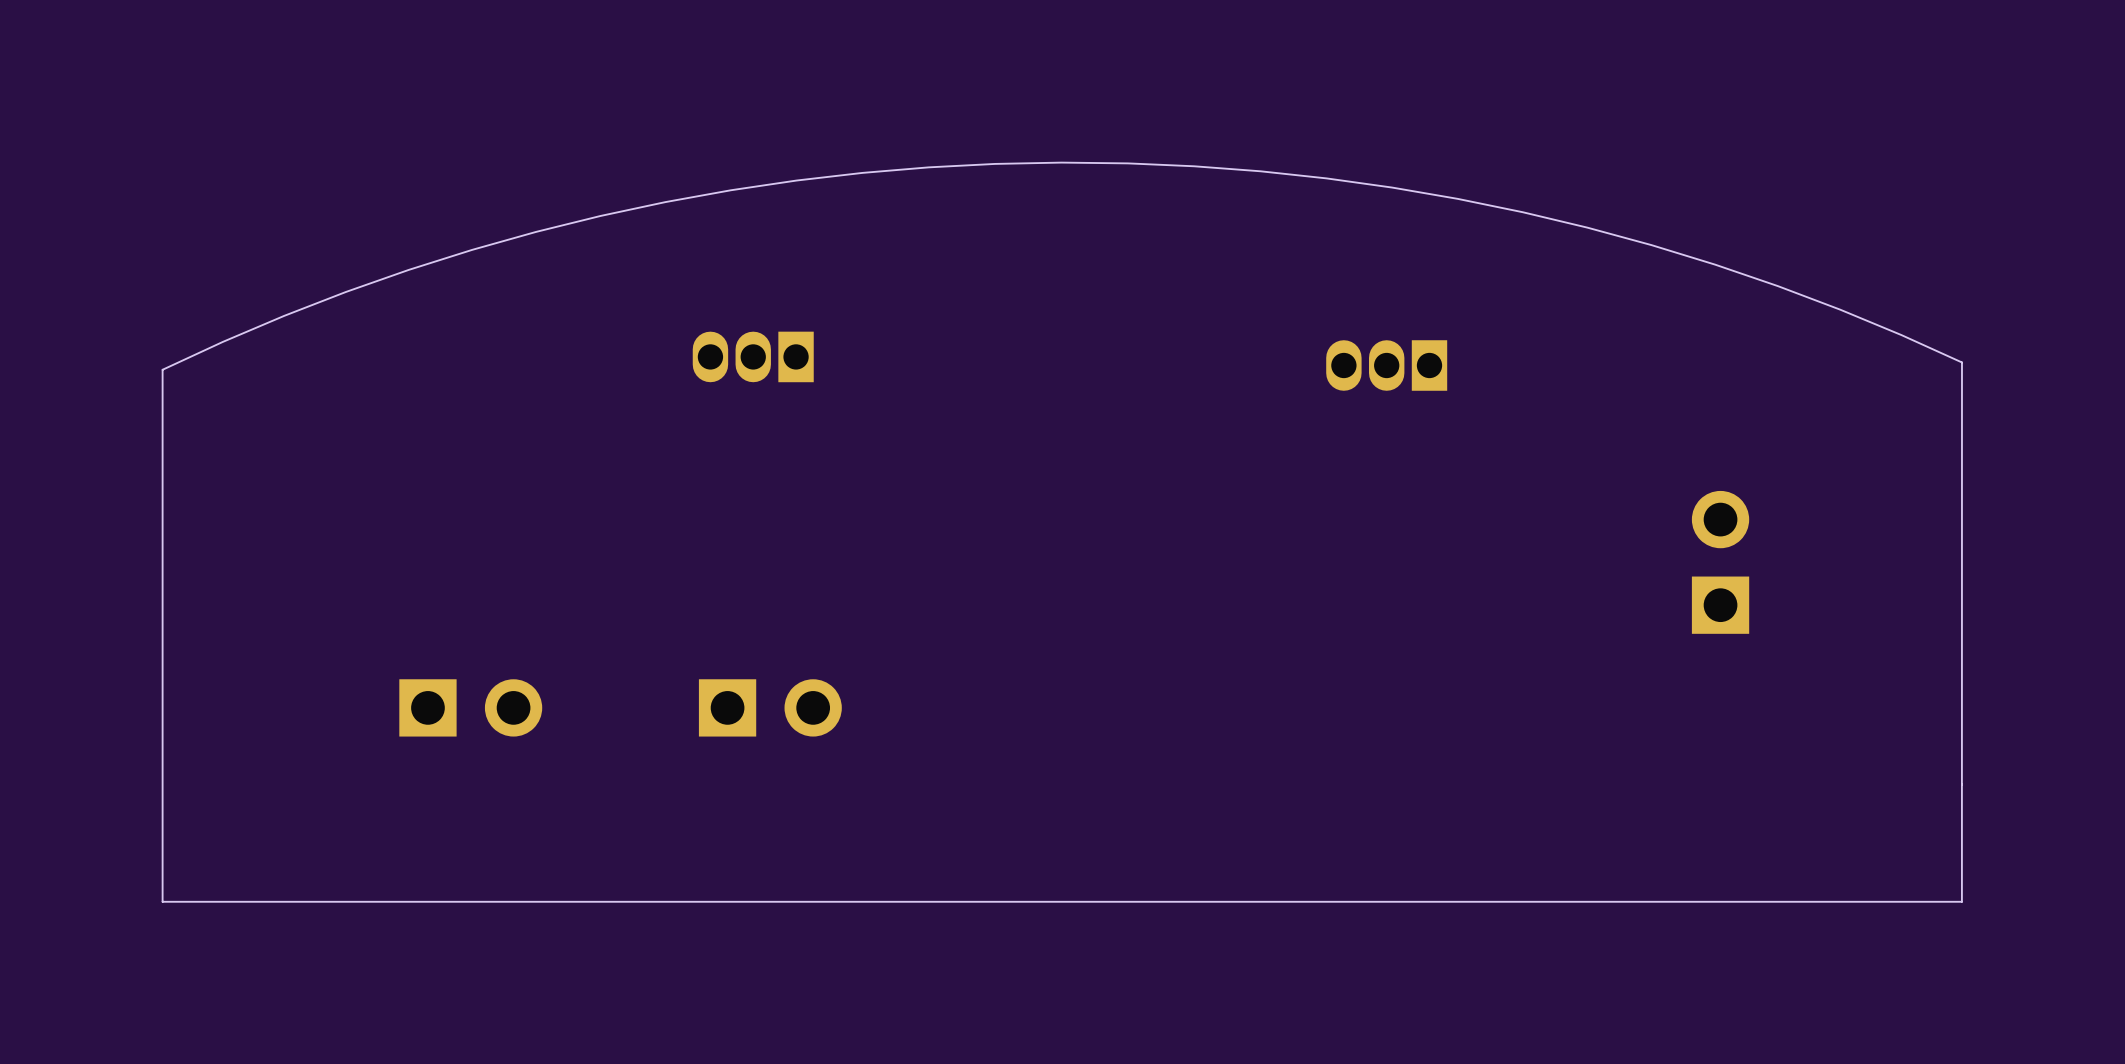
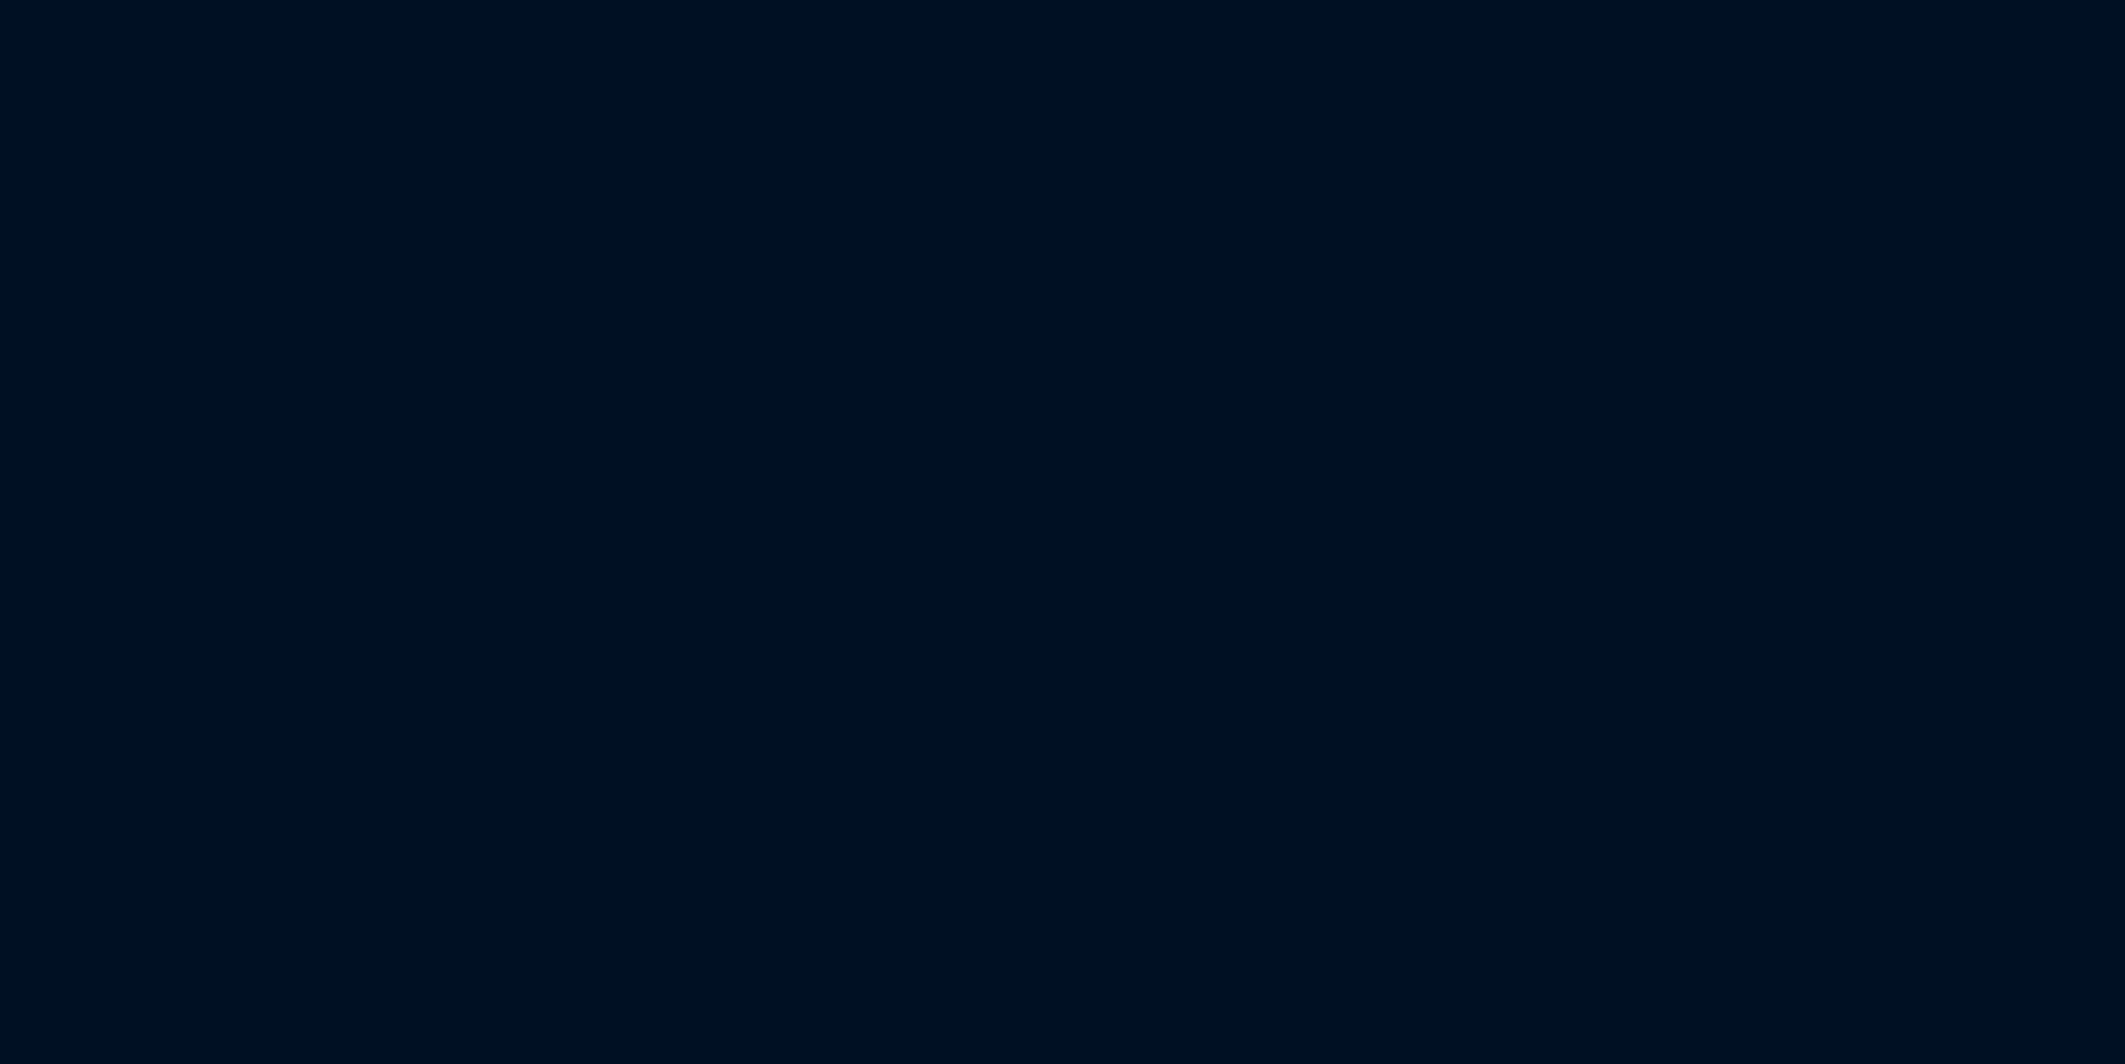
part: (753, 356) -> none
board edge: (1961, 362) (1961, 901) (162, 901) (162, 369) (284, 315) (346, 291) (472, 249) (600, 215) (730, 190) (796, 180) (928, 167) (995, 163) (1127, 163) (1194, 166) (1326, 178) (1392, 187) (1457, 198) (1587, 227) (1715, 264) (1777, 286) (1840, 309) (1961, 362) -> none
part: (1386, 365) -> none
part: (1720, 562) -> none
part: (470, 707) -> none
part: (770, 707) -> none

